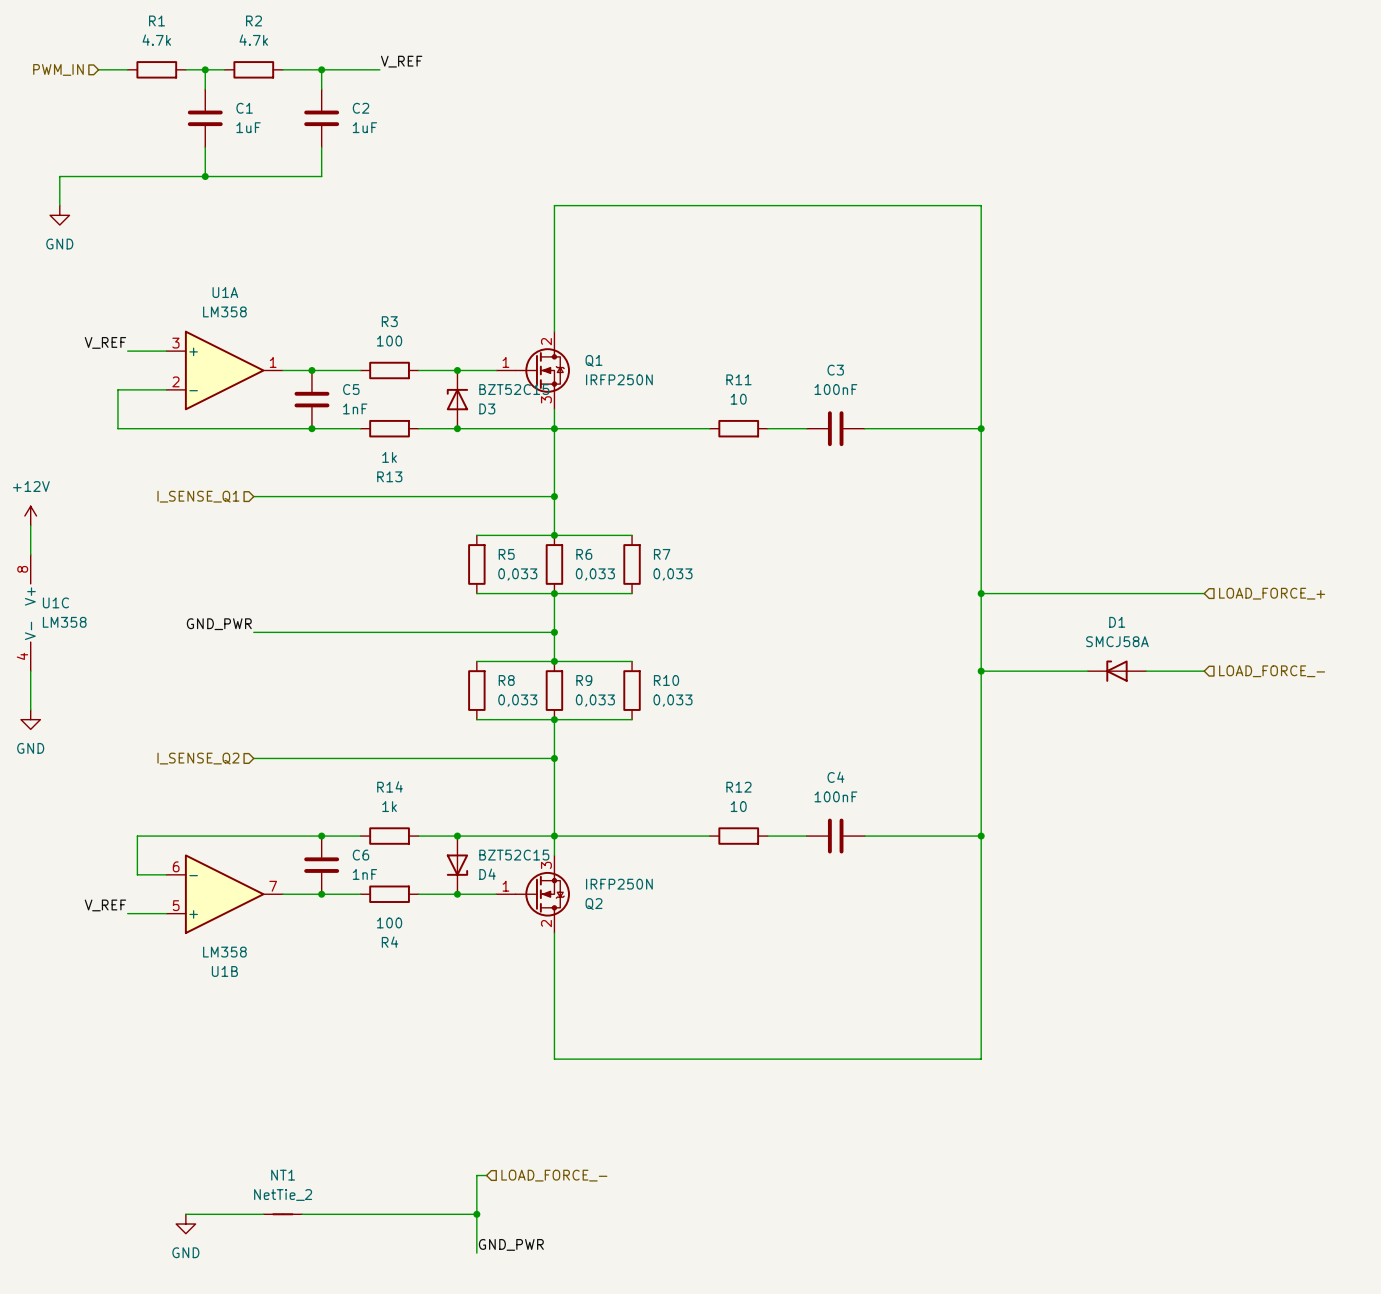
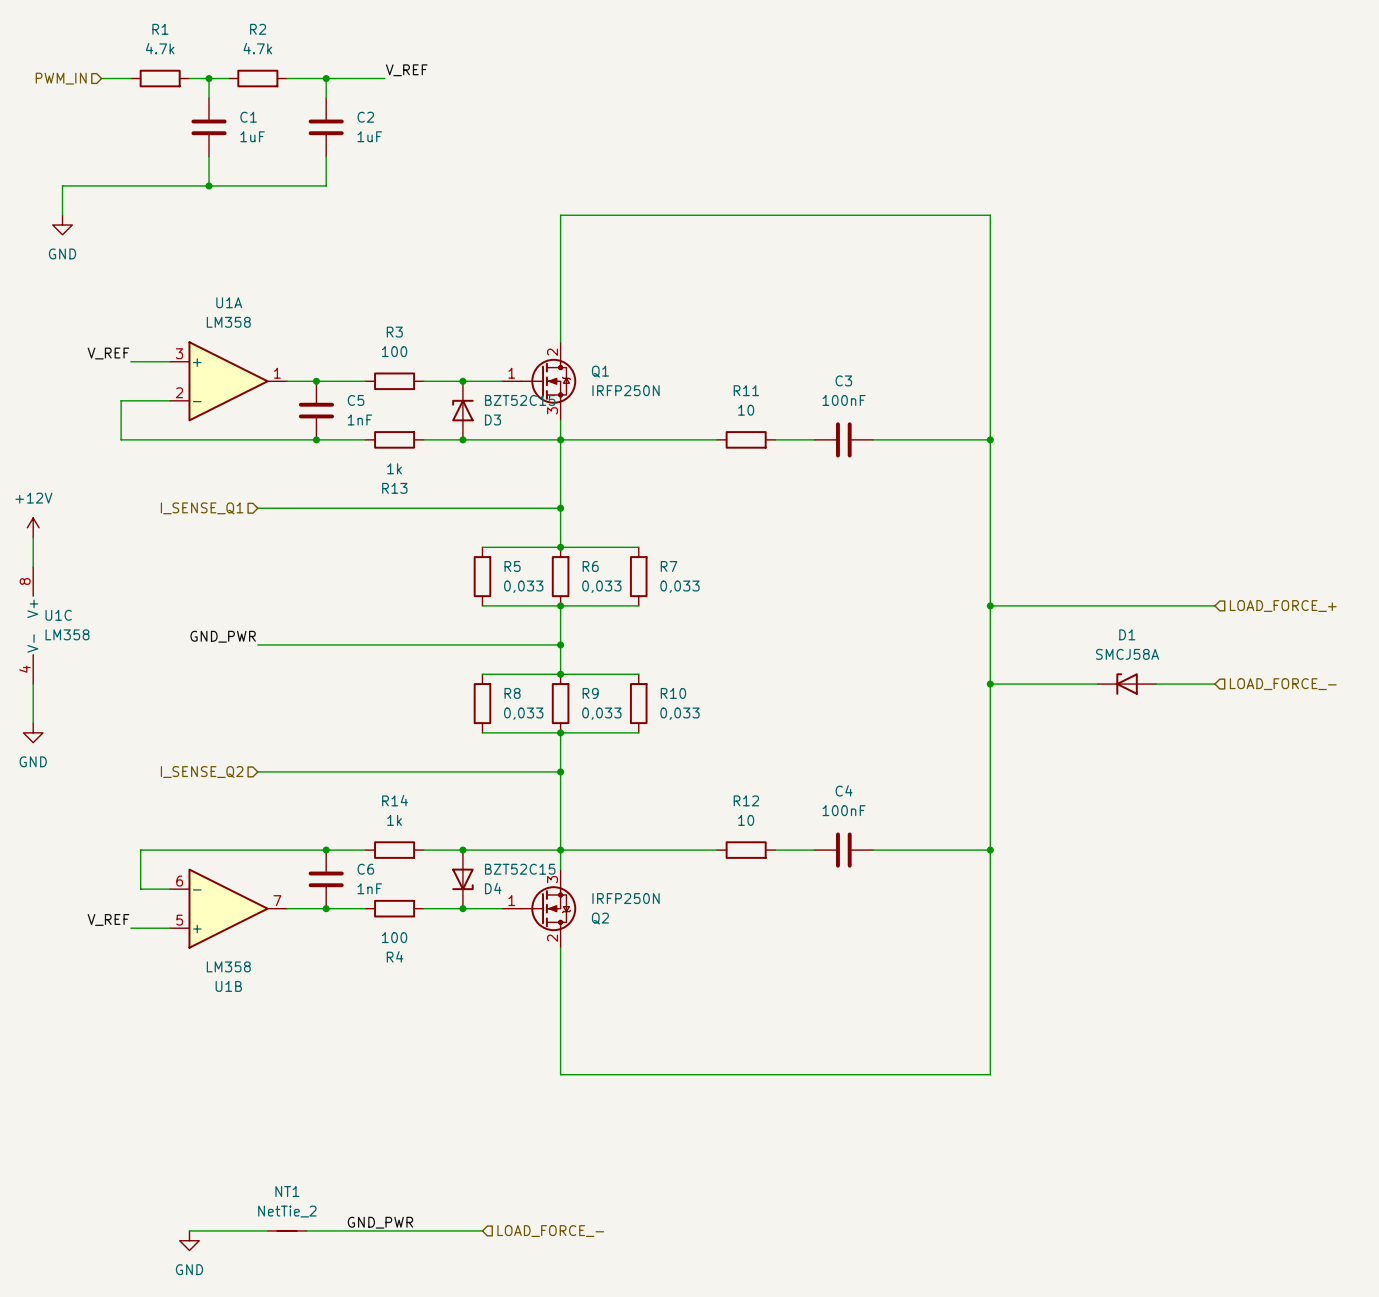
wire: (486, 1175) (476, 1175) (476, 1253) -> none
hierarchical label position: LOAD_FORCE_- (554, 1175) -> LOAD_FORCE_- (550, 1231)
junction: (476, 1214) -> none
label position: GND_PWR (511, 1244) -> GND_PWR (380, 1222)

